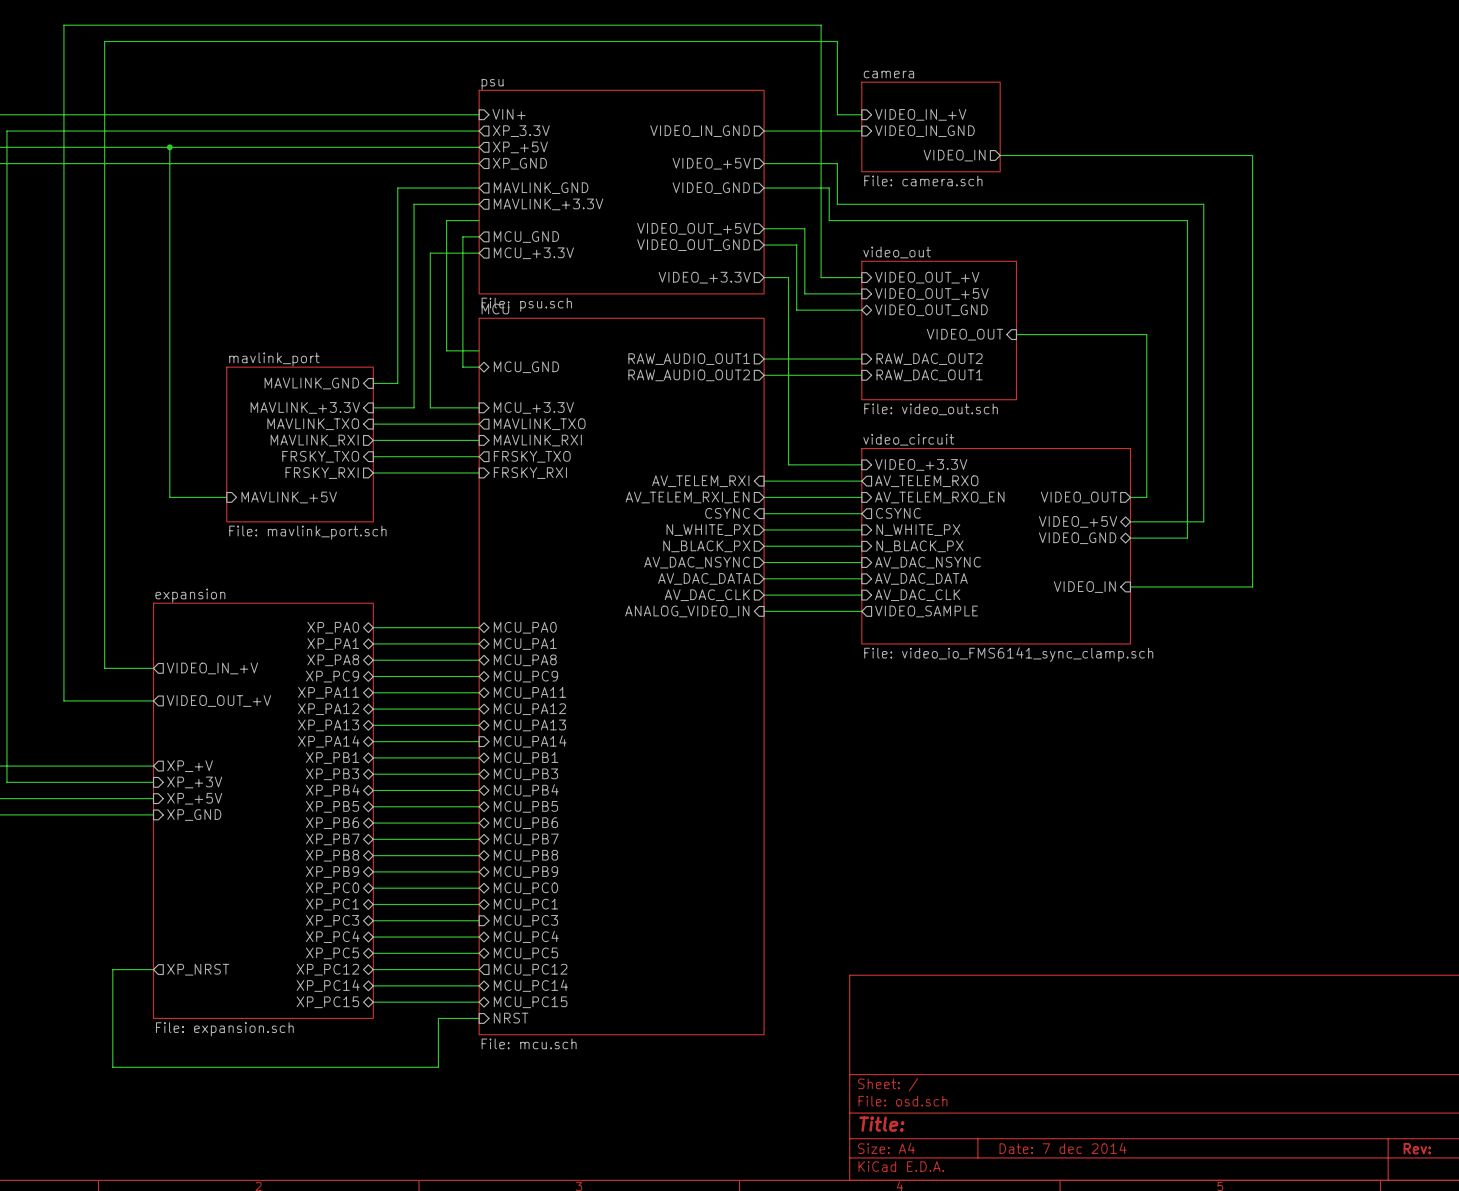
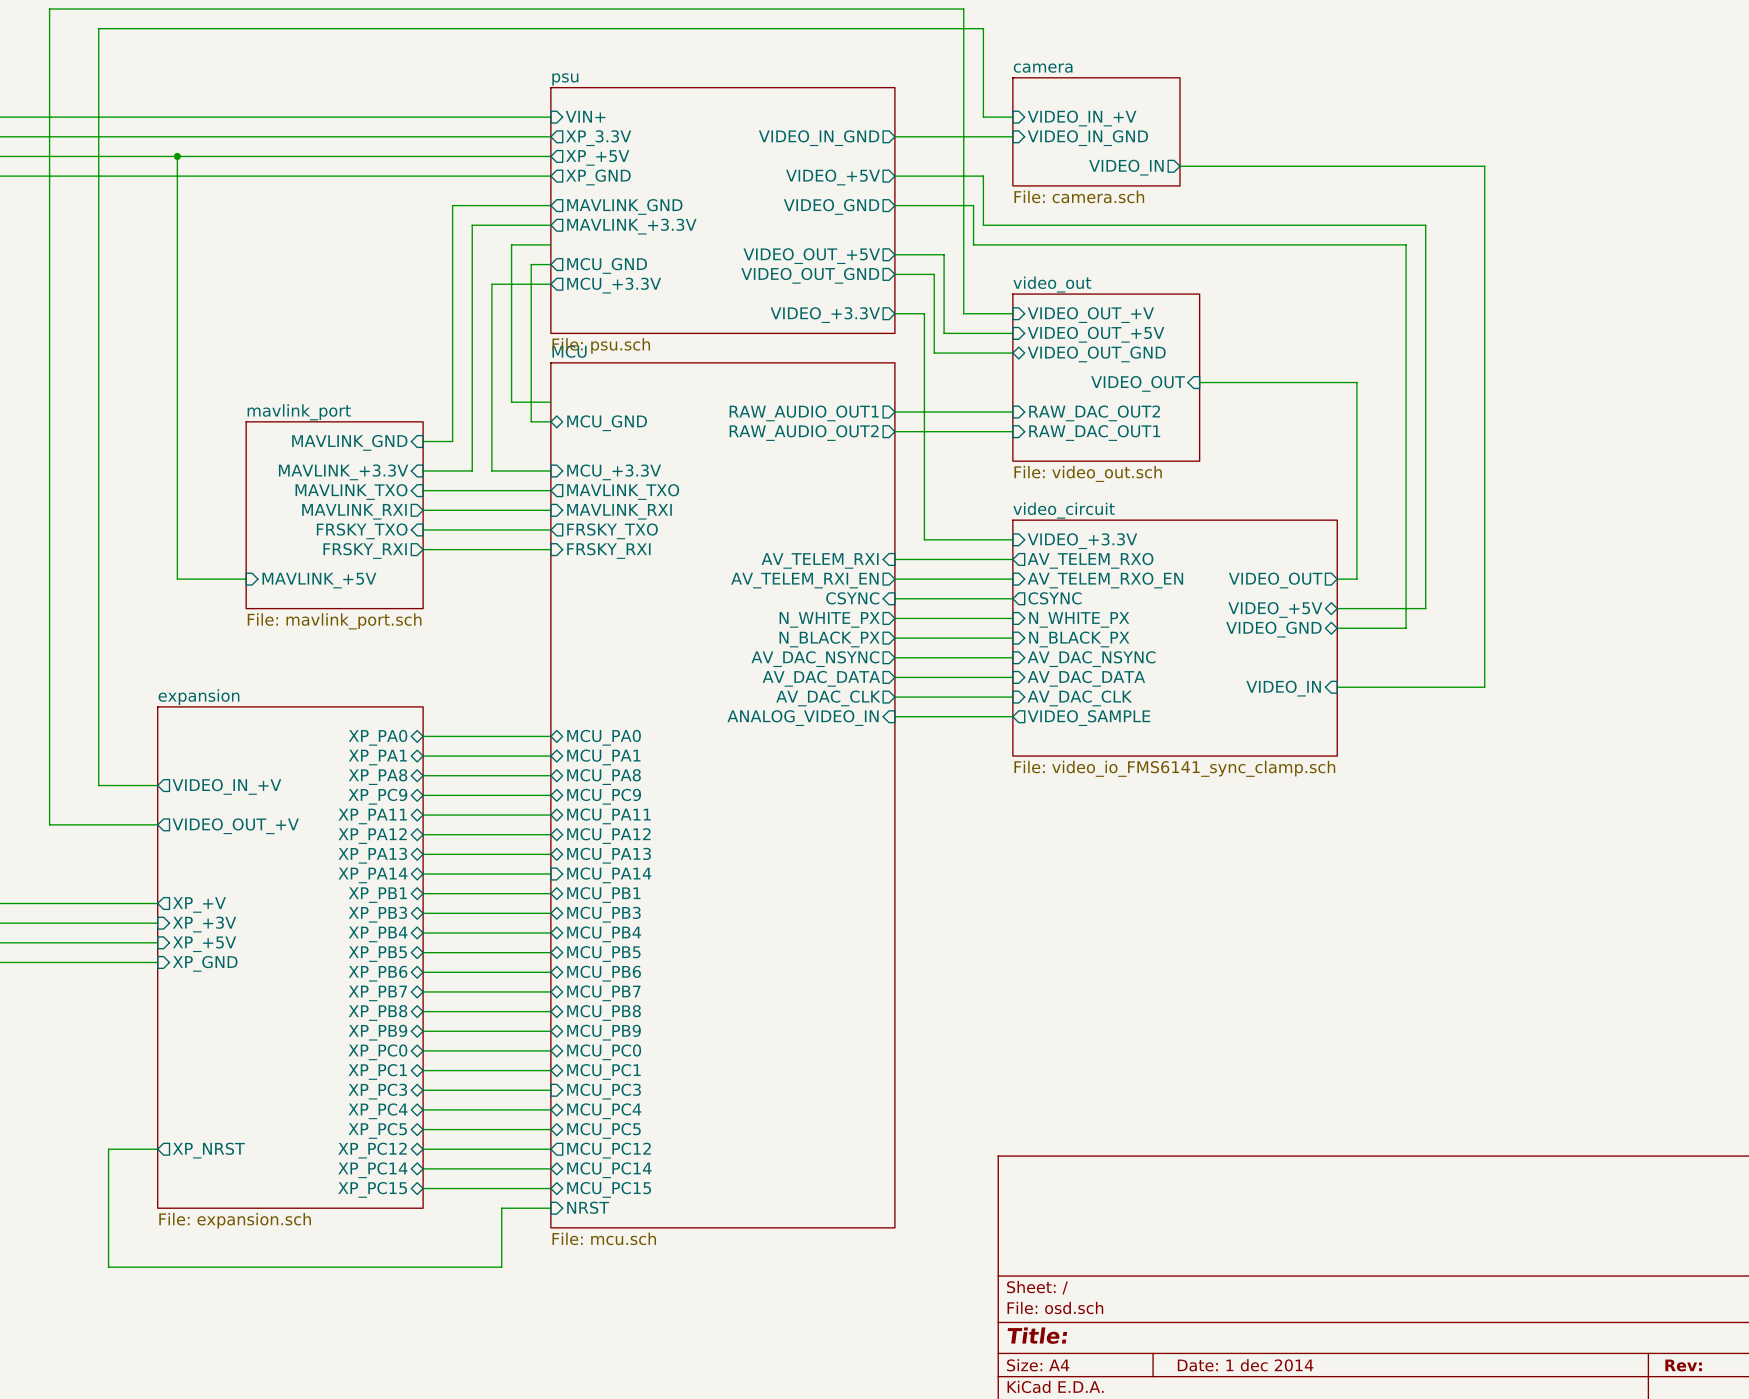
title block: Date: 7 dec 2014 (1063, 1148) -> Date: 1 dec 2014 (1245, 1365)

